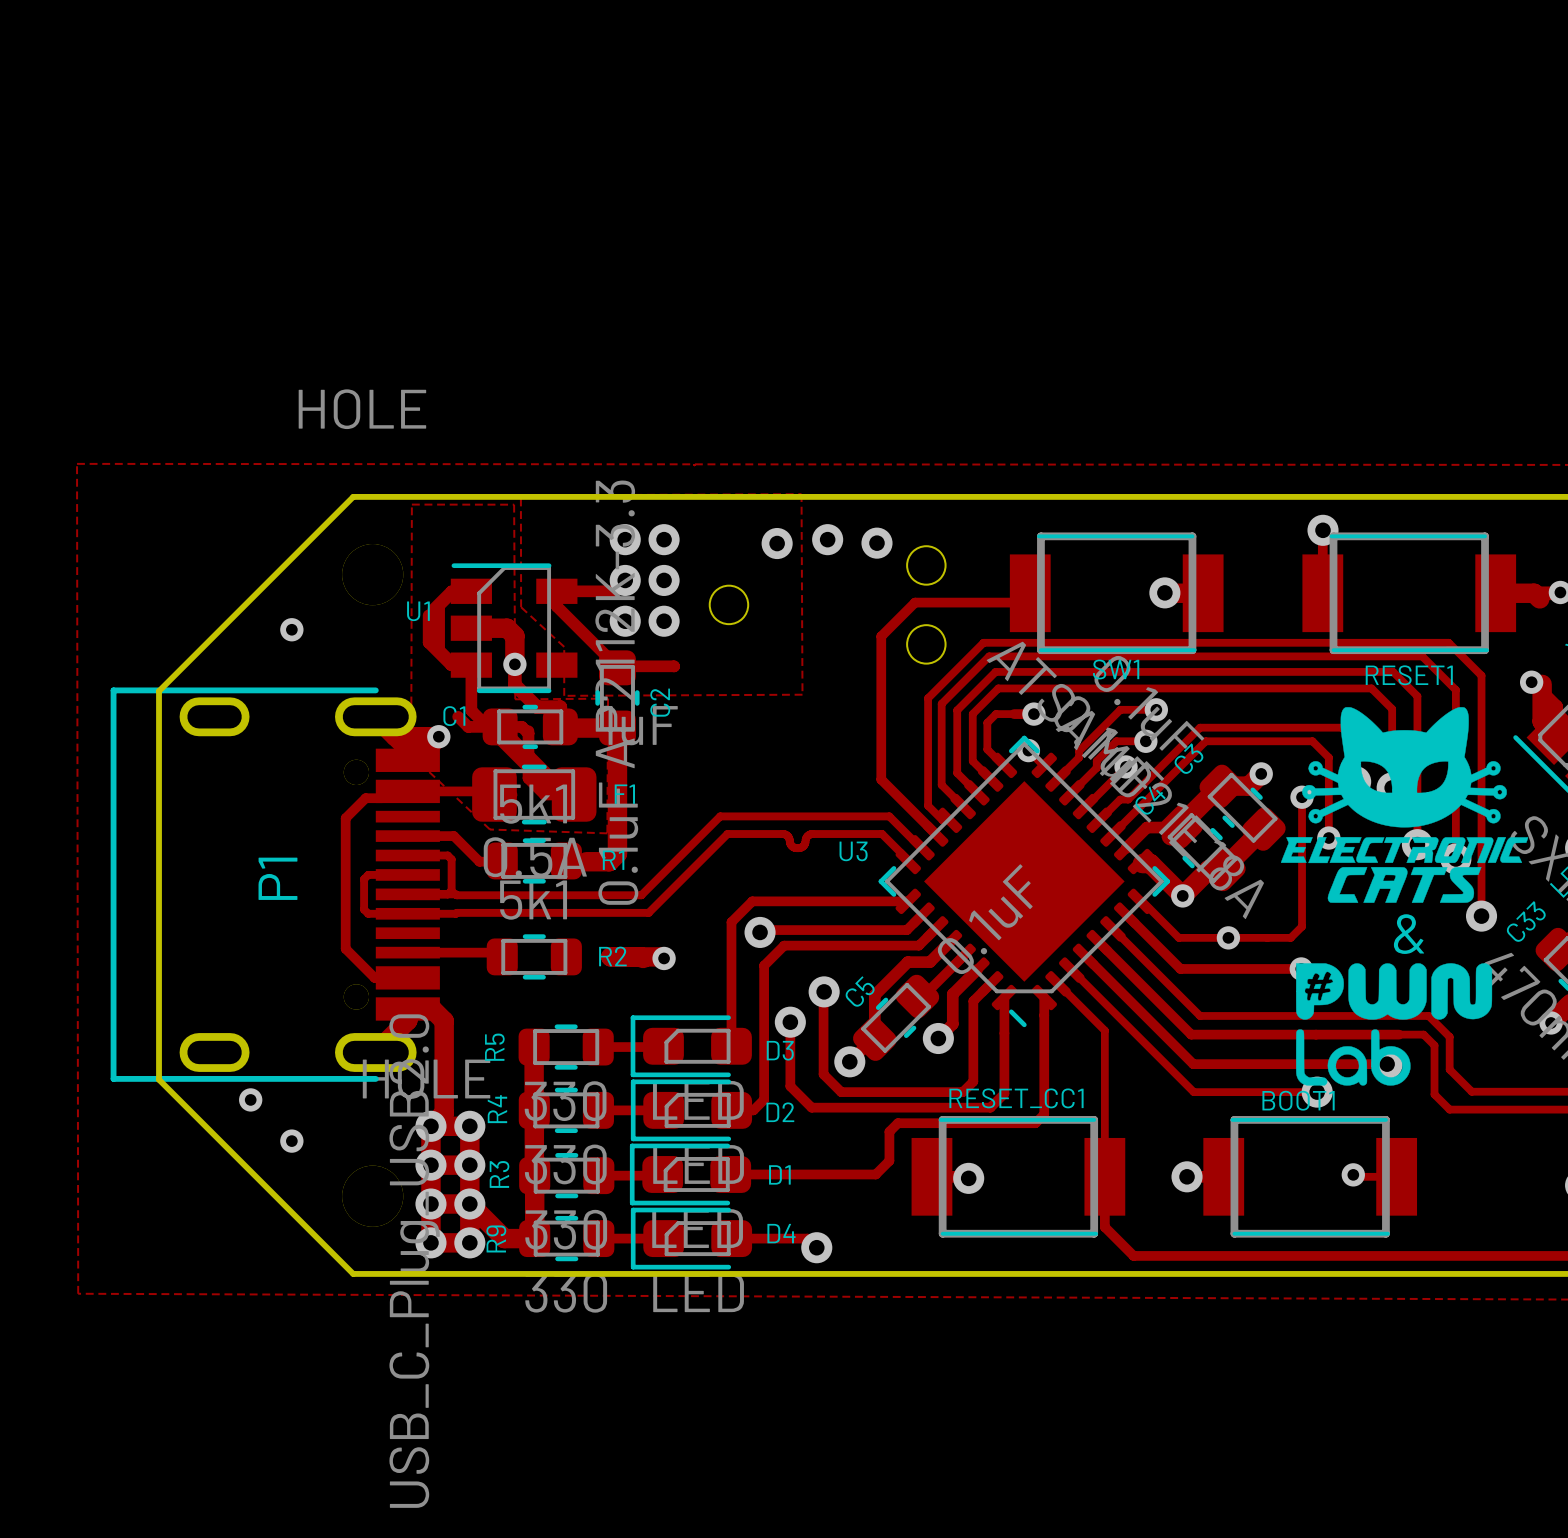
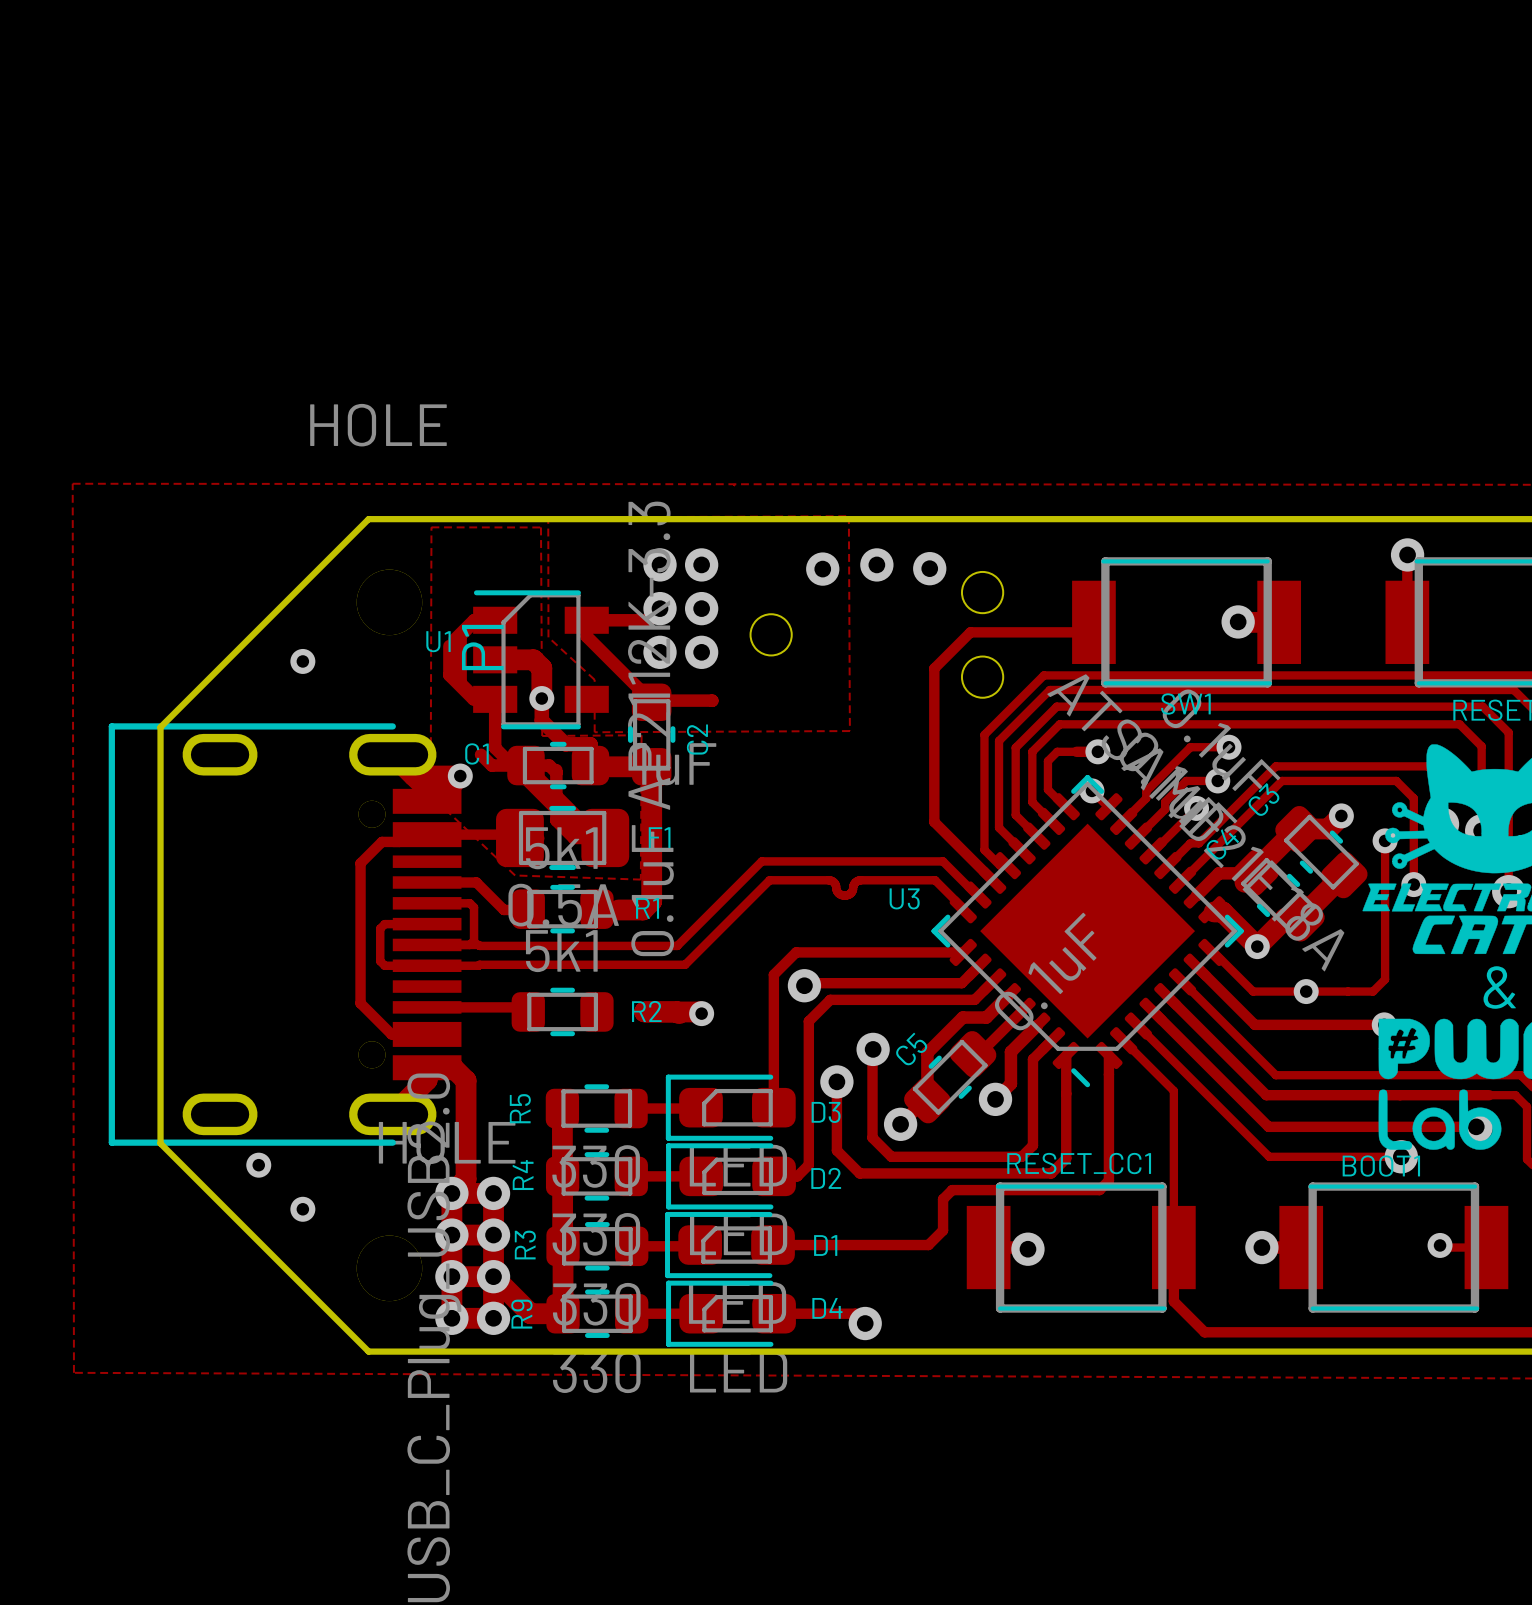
P1 name position: P1 (277, 878) -> P1 (482, 647)

